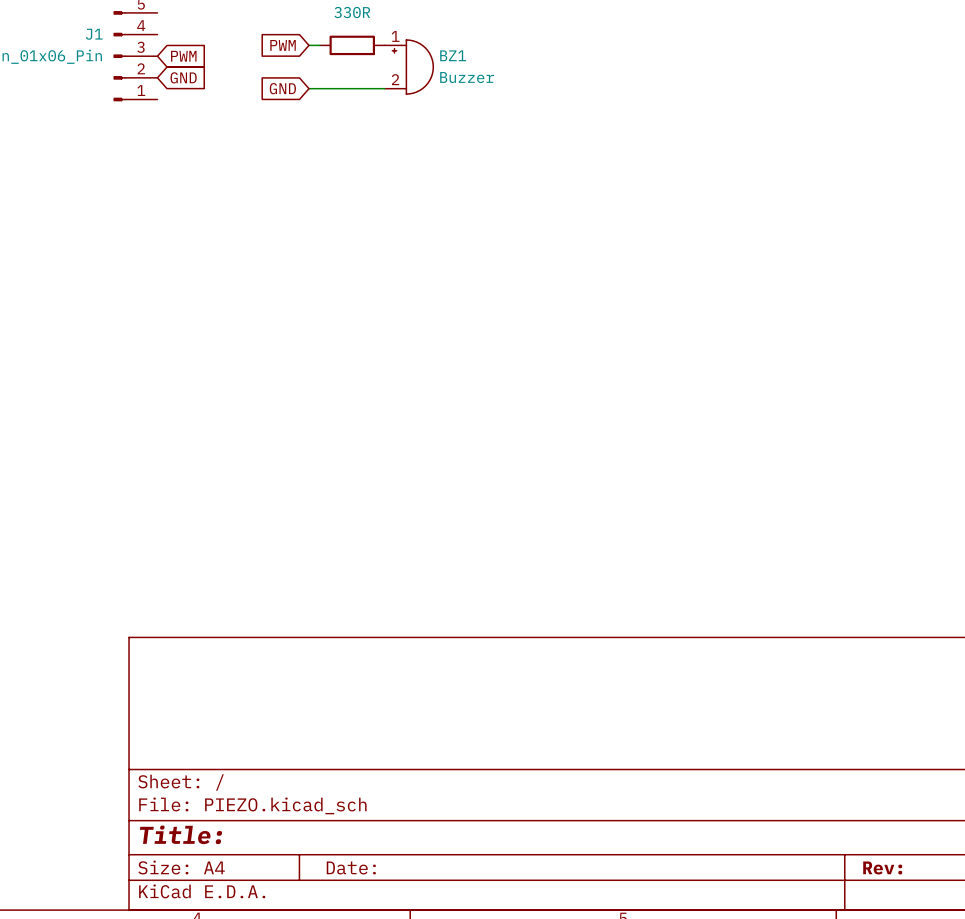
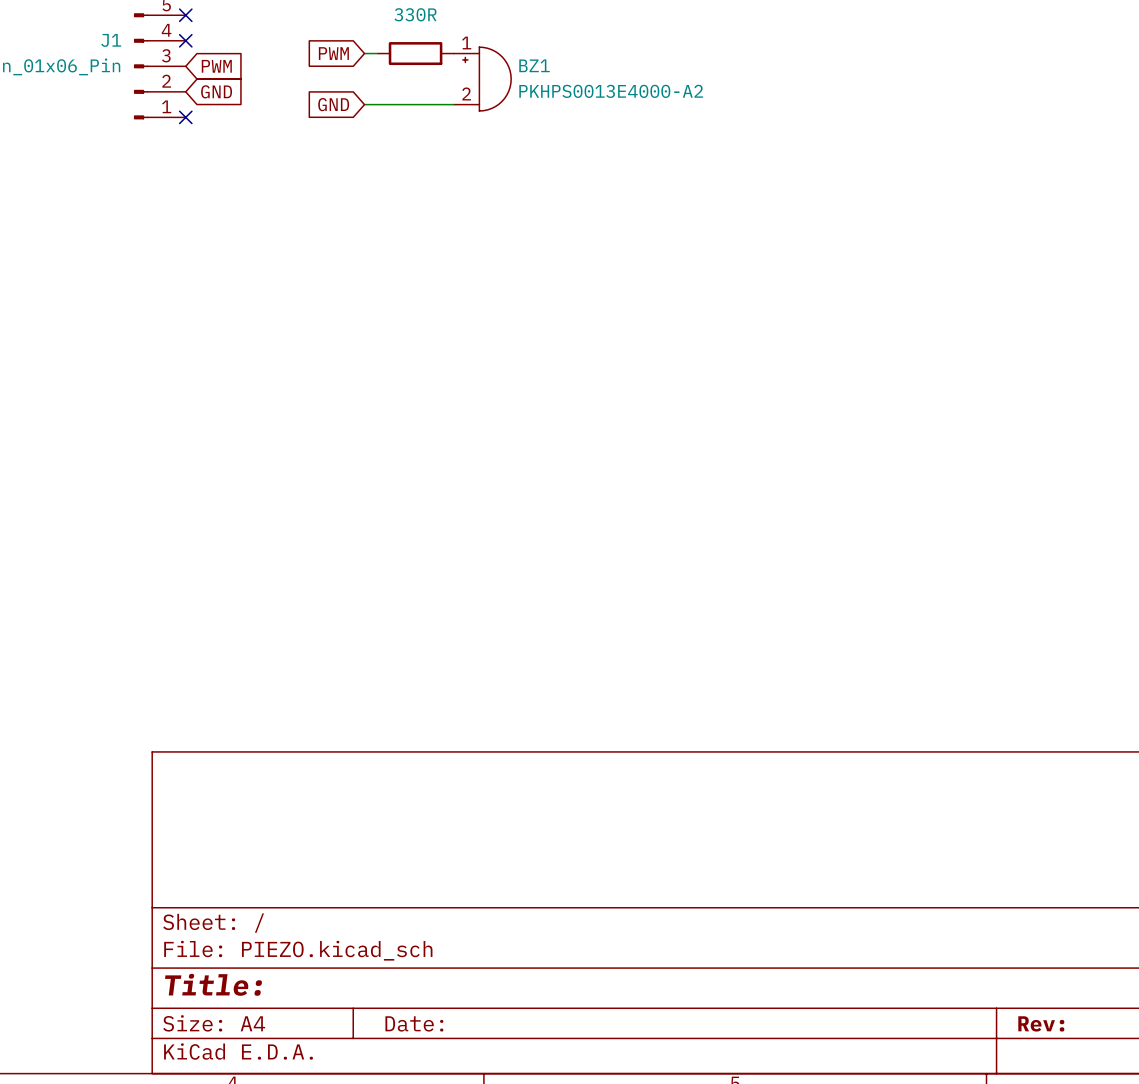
no-connect mark: none -> (185, 15)
no-connect mark: none -> (185, 40)
BZ1 value: Buzzer (467, 77) -> PKHPS0013E4000-A2 (611, 91)
no-connect mark: none -> (185, 117)

